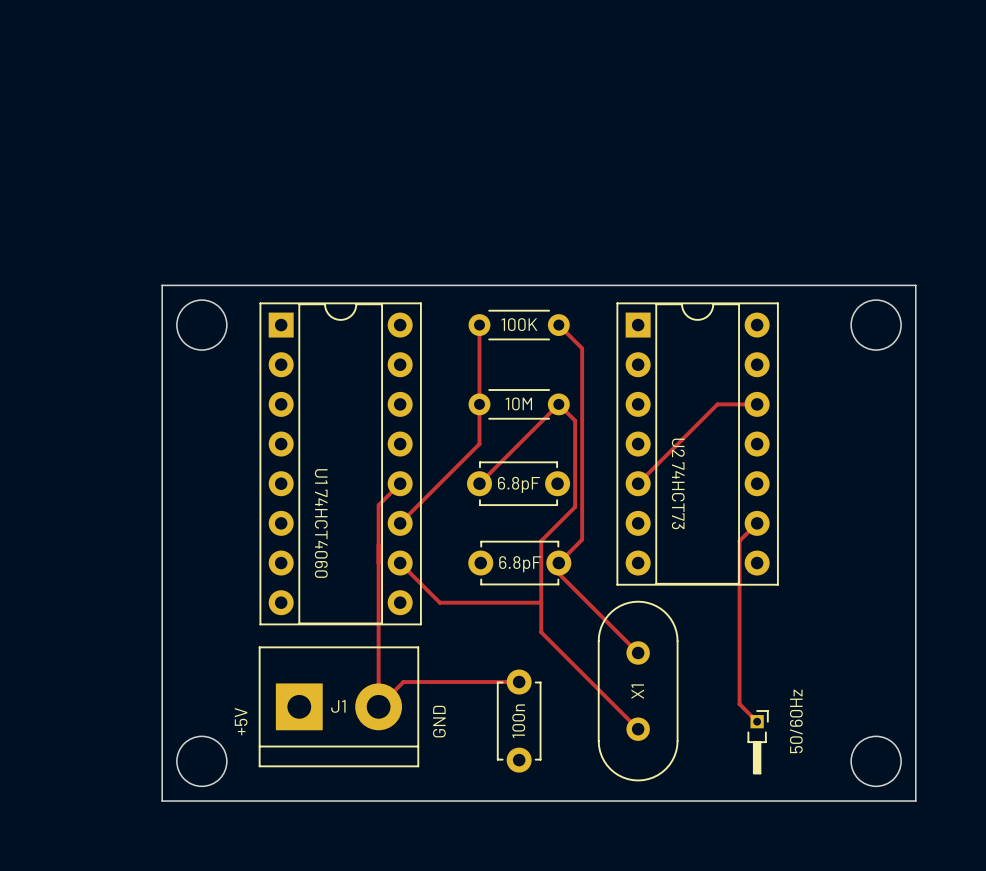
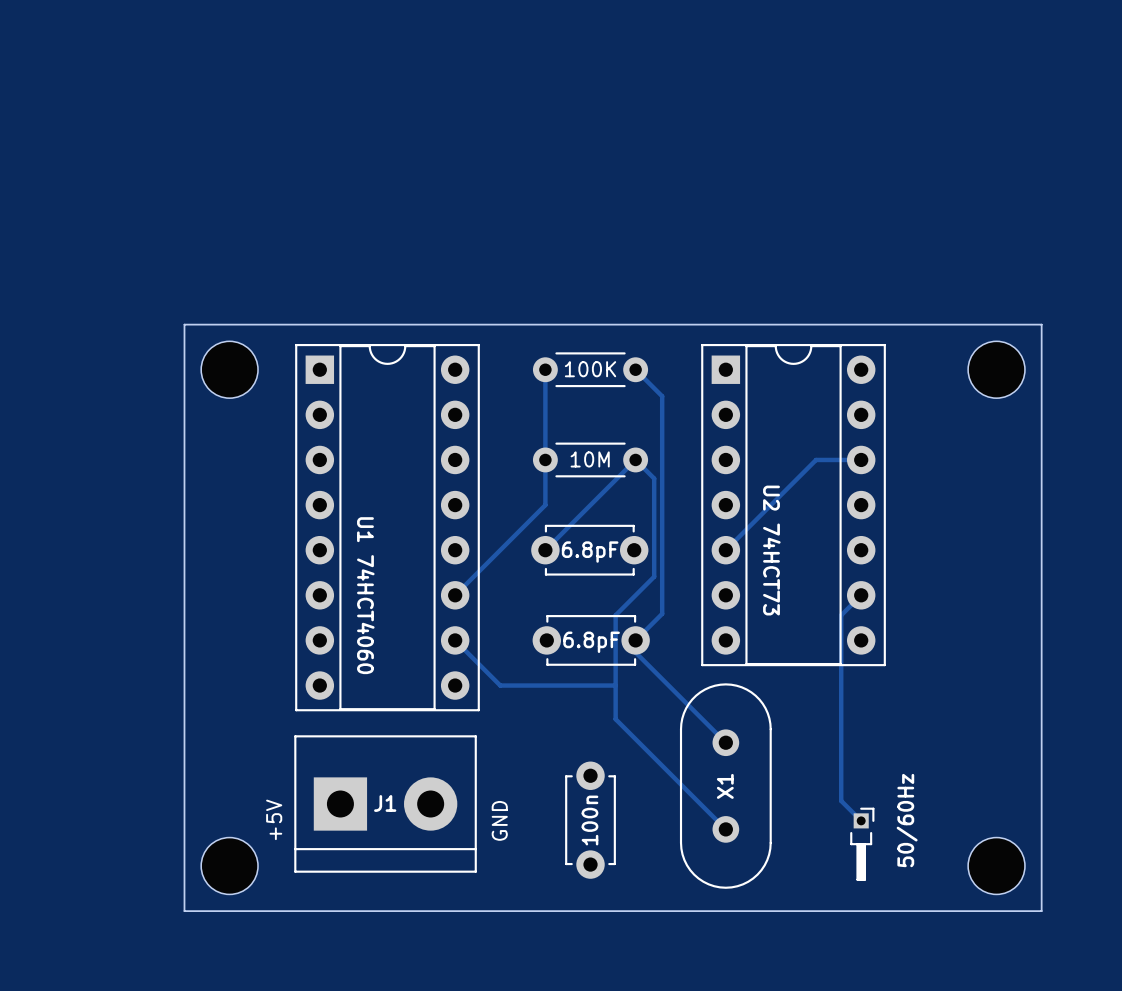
track: (400, 483) (378, 505) (378, 706) (403, 682) (519, 682) -> none

